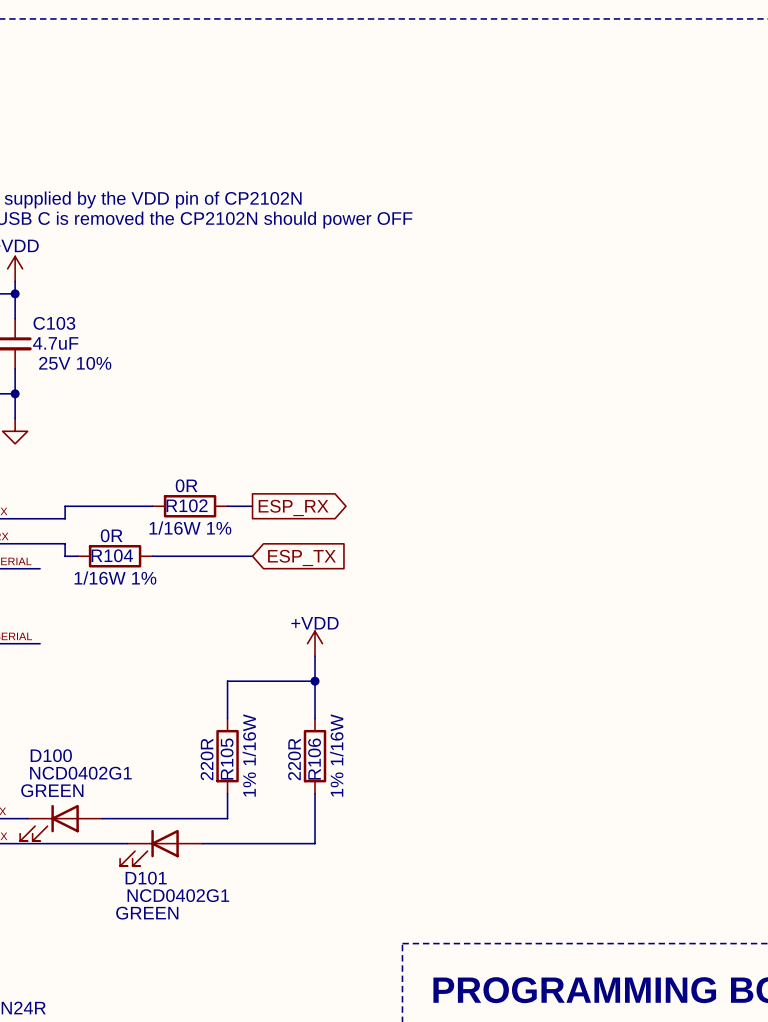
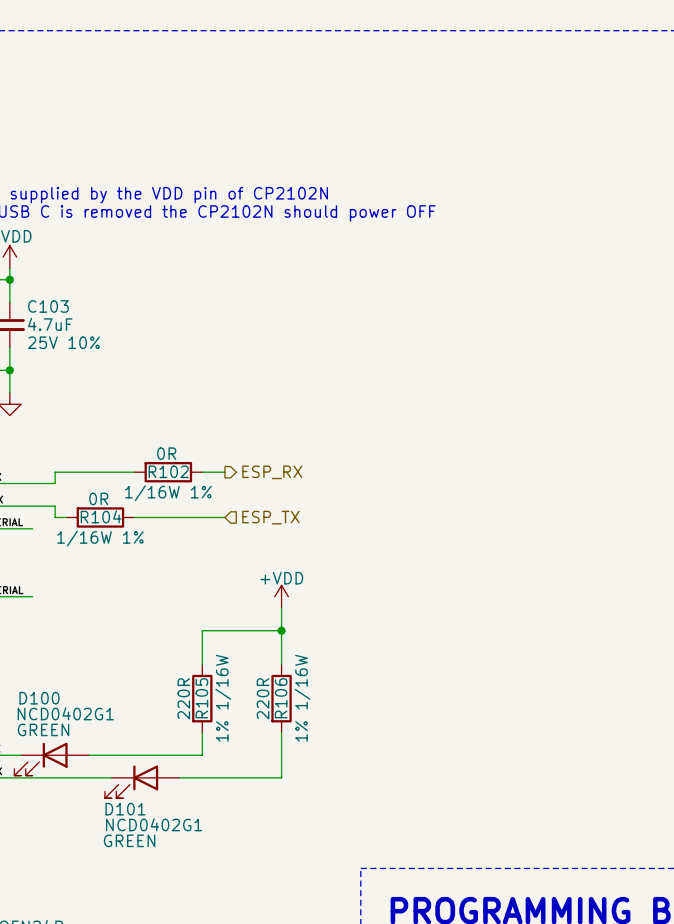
global label: ESP_RX (293, 507) -> none
hierarchical label: none -> ESP_RX (272, 472)
global label: ESP_TX (301, 557) -> none
hierarchical label: none -> ESP_TX (270, 517)

